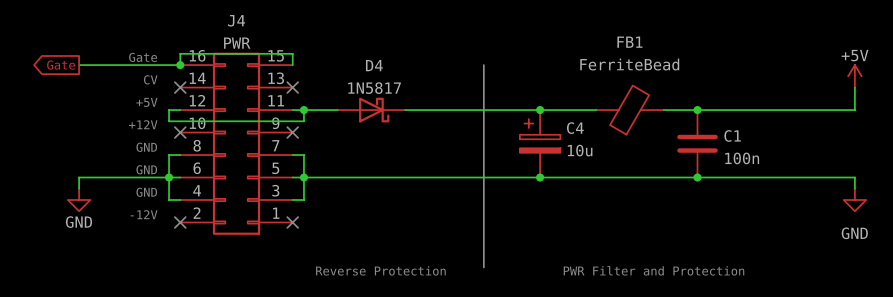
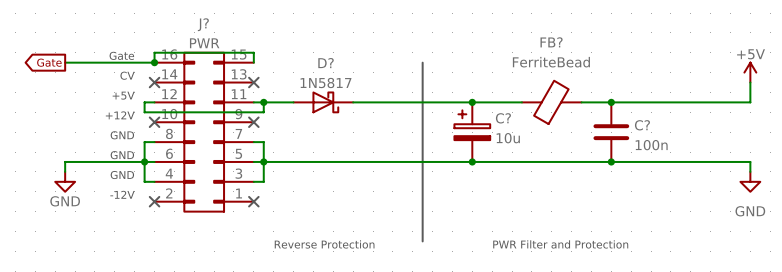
J4 name: J4 (236, 20) -> J? (203, 24)
FB1 name: FB1 (629, 42) -> FB? (551, 42)
D4 name: D4 (374, 65) -> D? (326, 63)
C4 name: C4 (575, 128) -> C? (503, 118)
C1 name: C1 (732, 135) -> C? (642, 125)

